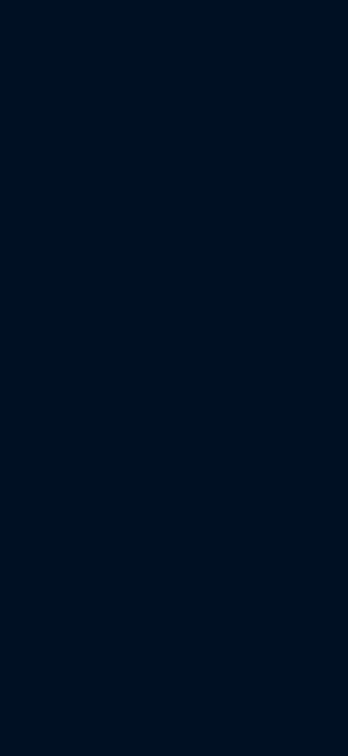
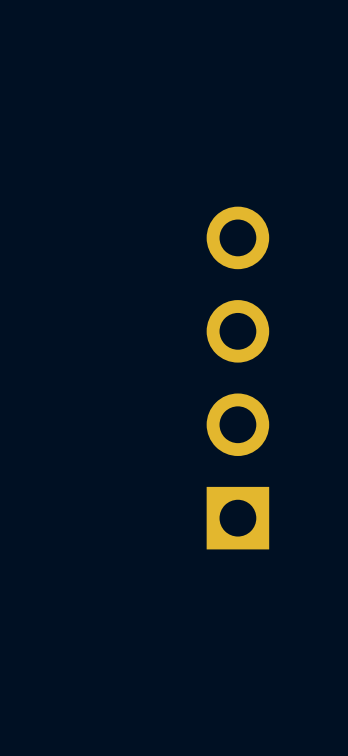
part: none -> (237, 378)

